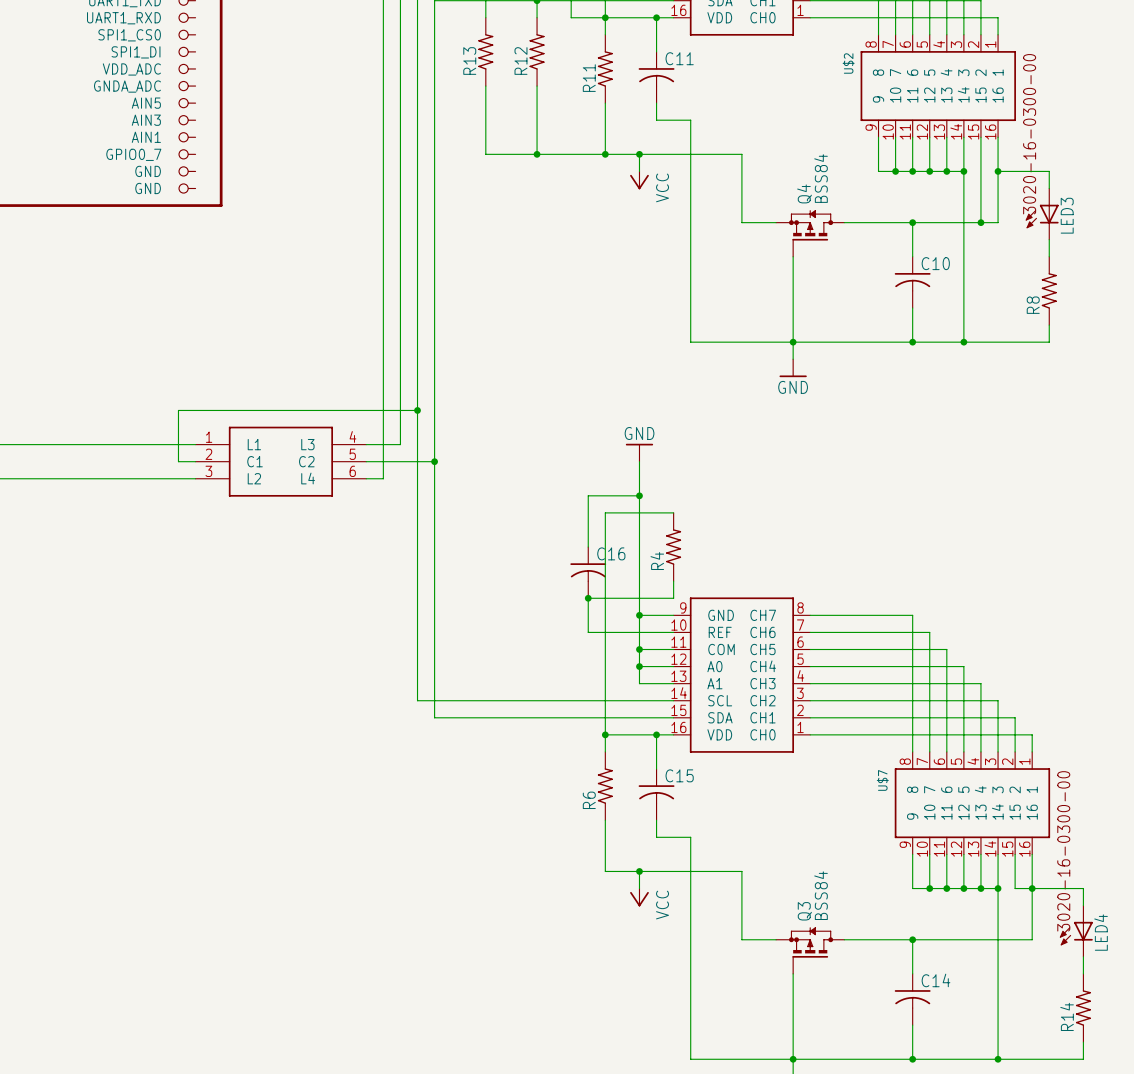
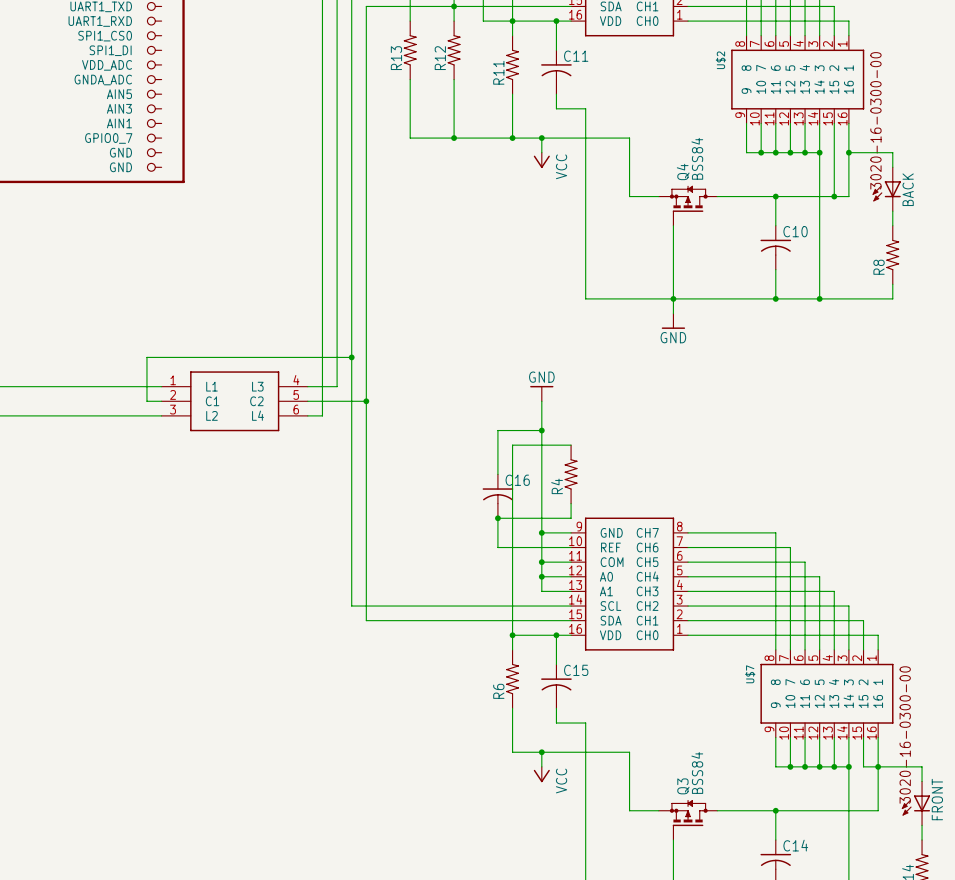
LED3 name: LED3 (1067, 215) -> BACK (908, 189)
LED4 name: LED4 (1101, 932) -> FRONT (937, 799)

